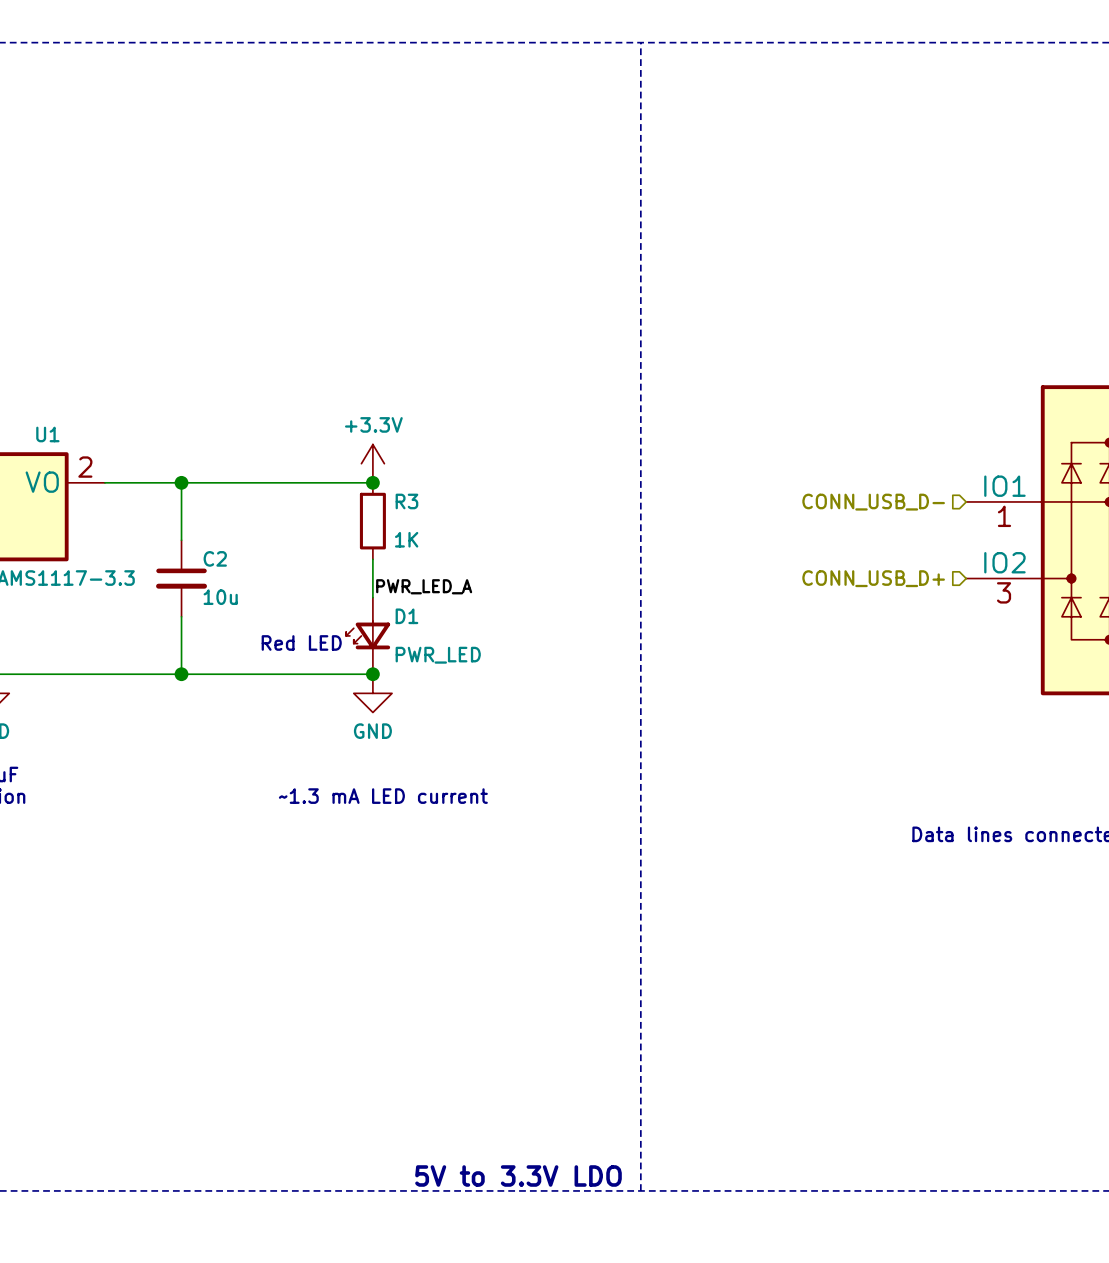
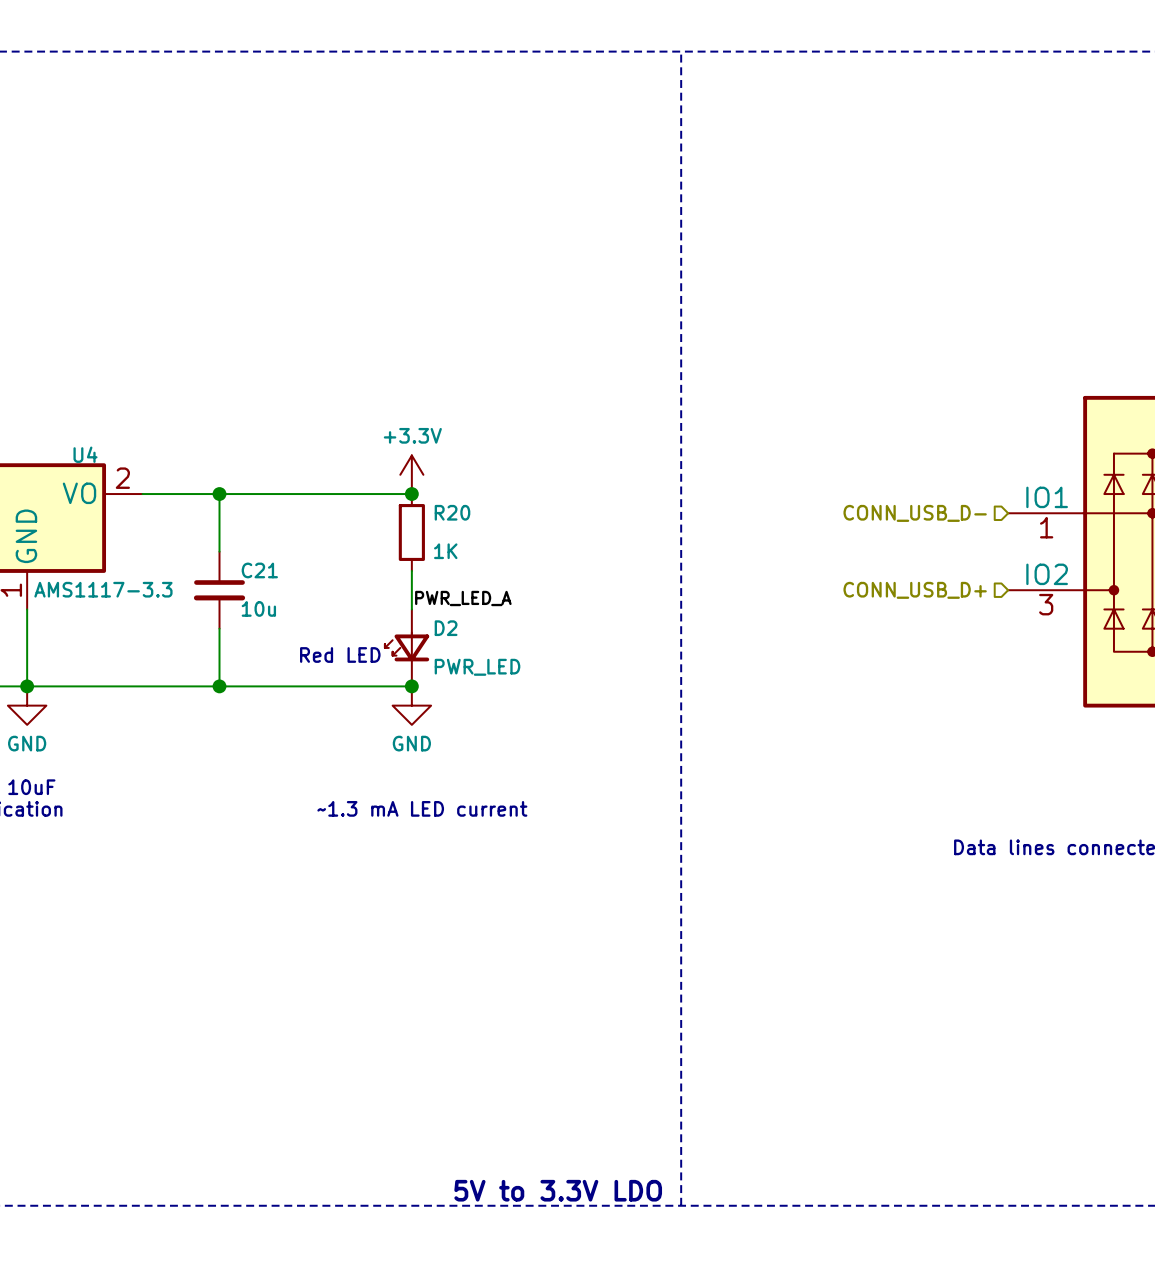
U1 name: U1 (47, 434) -> U4 (85, 454)
R3 name: R3 (406, 501) -> R20 (452, 512)
C2 name: C2 (215, 558) -> C21 (259, 570)
D1 name: D1 (406, 616) -> D2 (446, 628)

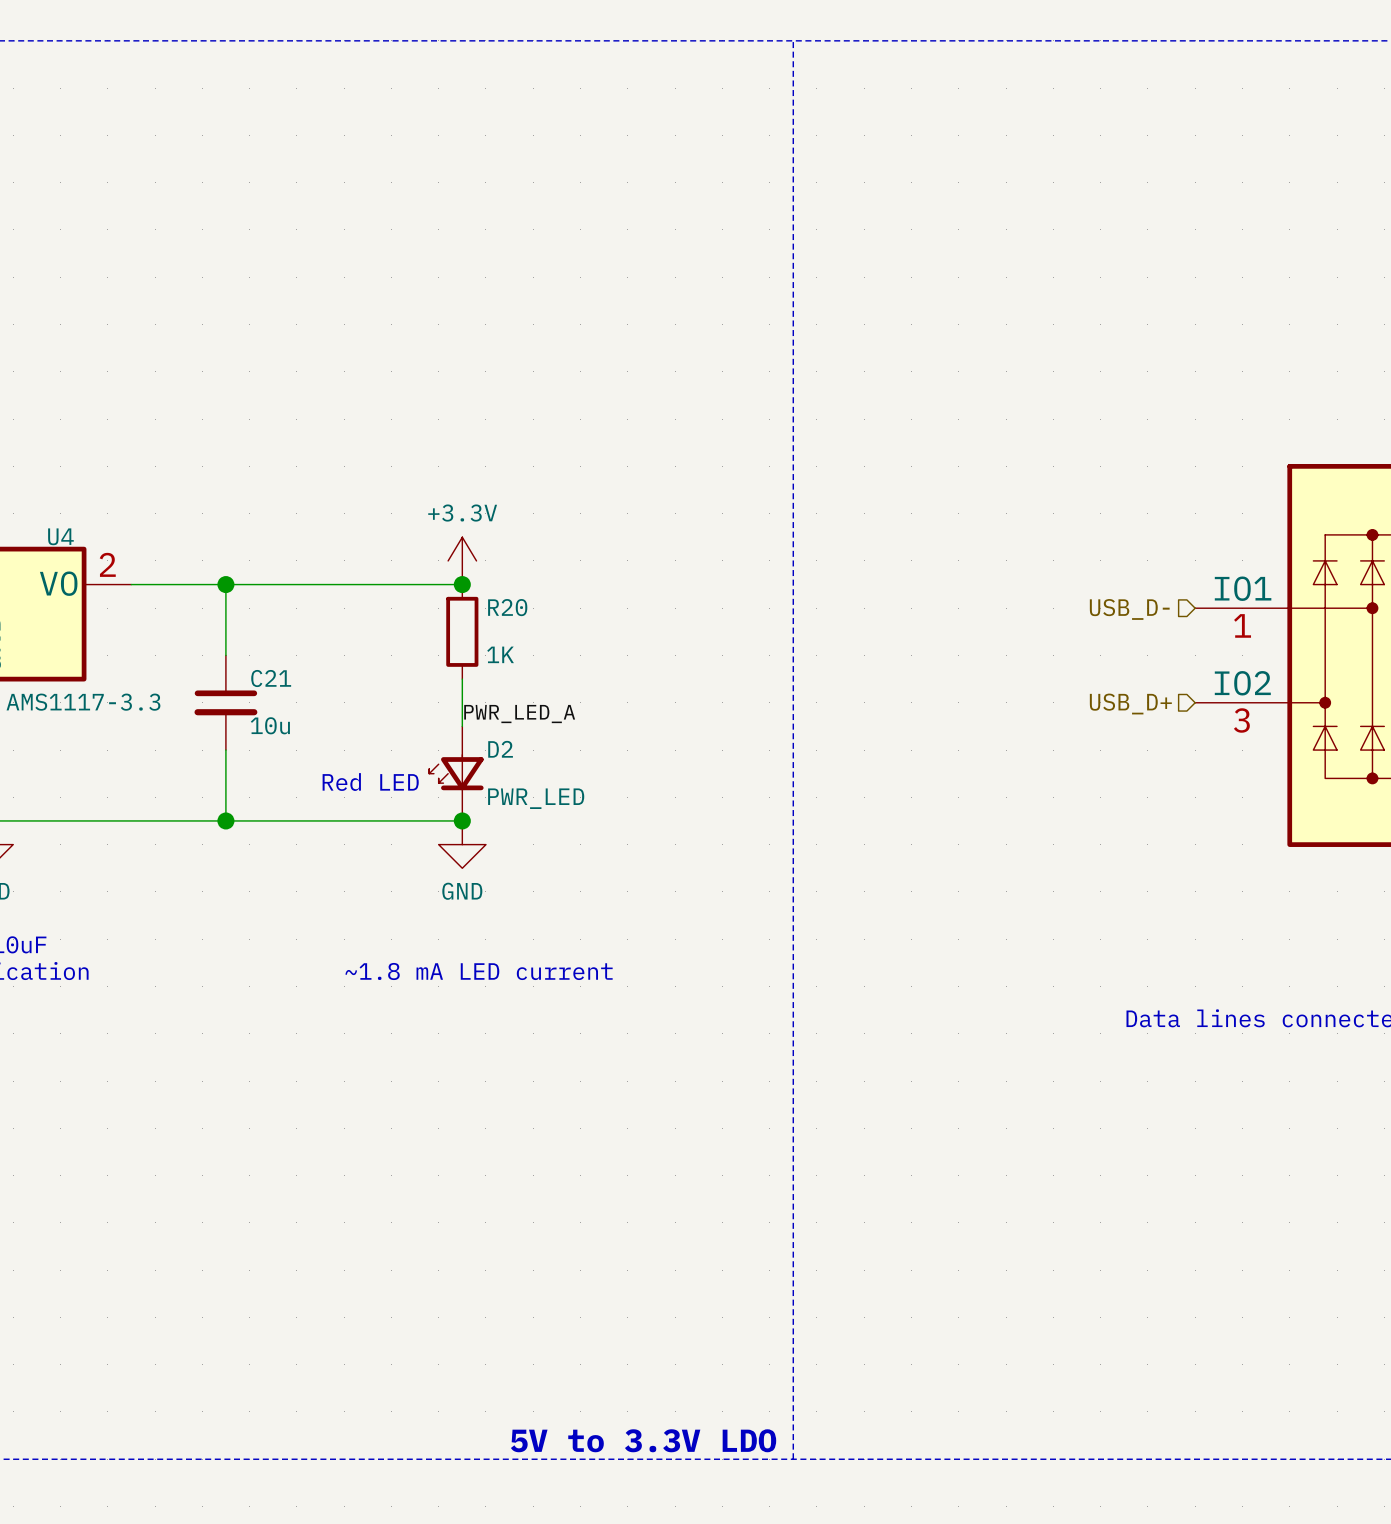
hierarchical label: CONN_USB_D- (915, 513) -> USB_D- (1129, 609)
hierarchical label: CONN_USB_D+ (915, 590) -> USB_D+ (1130, 704)
text: ~1.3 mA LED current (422, 808) -> ~1.8 mA LED current (479, 971)

